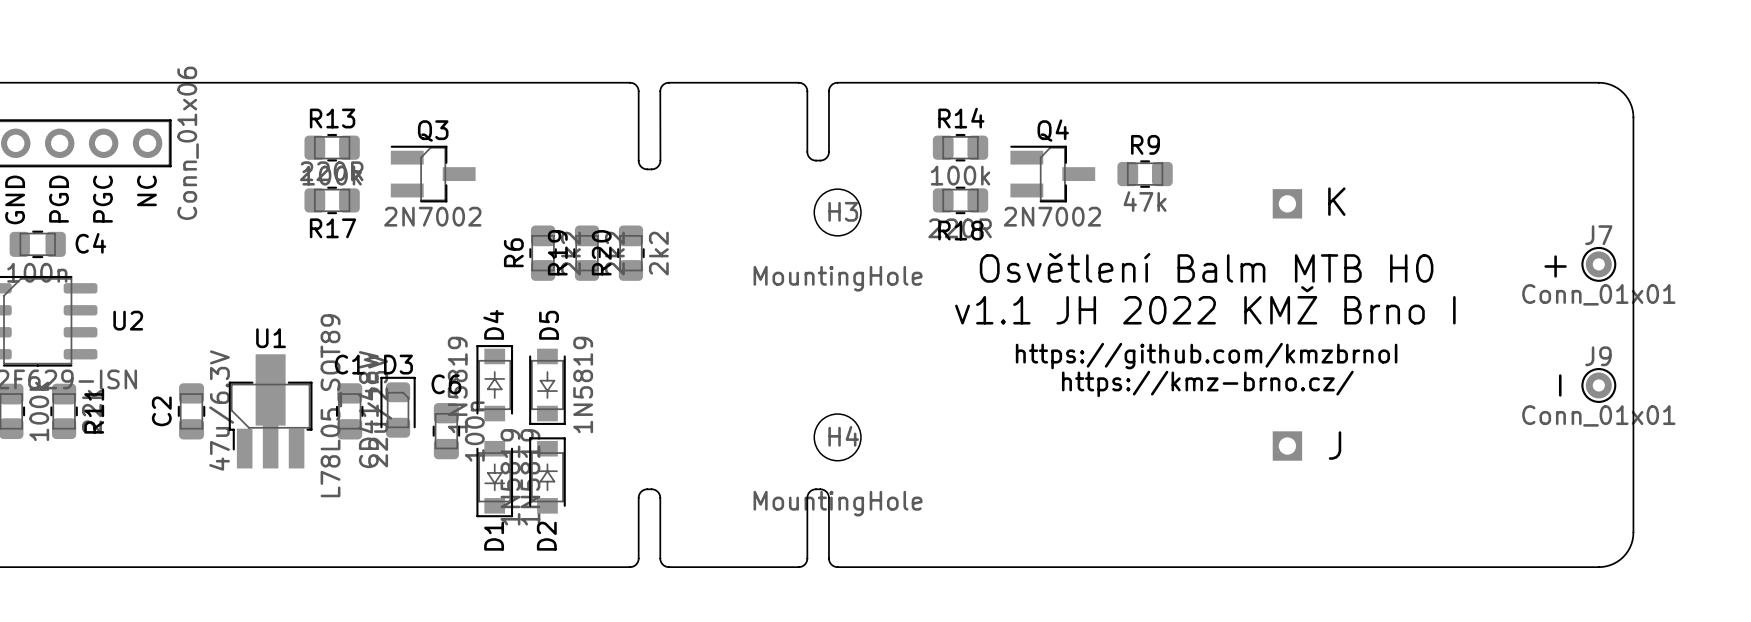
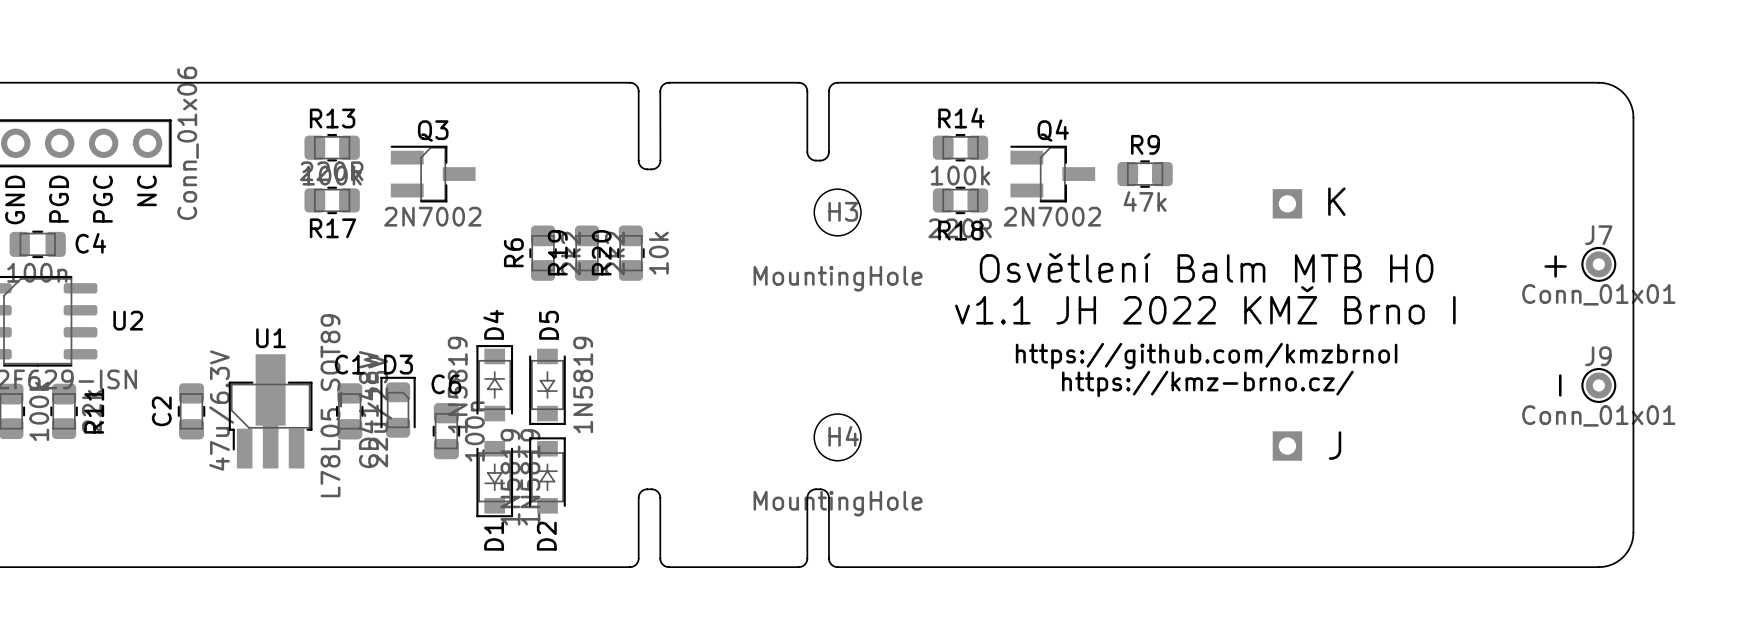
R20 value: 2k2 (658, 253) -> 10k (658, 253)

